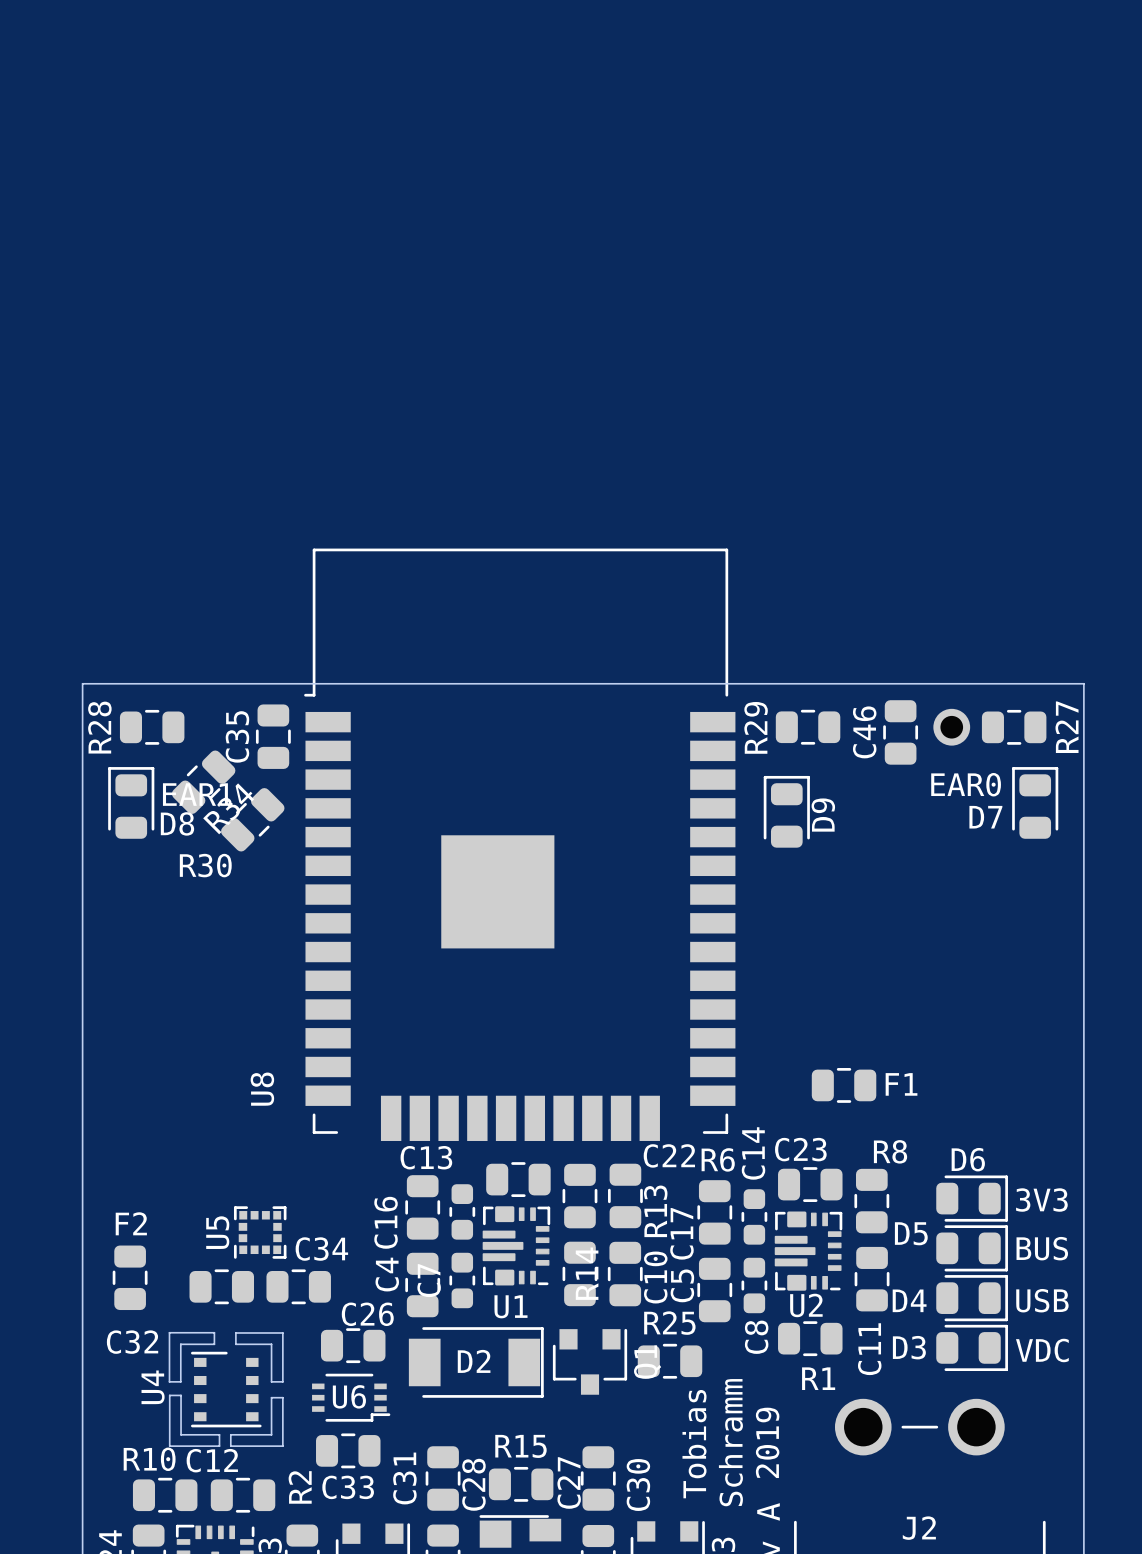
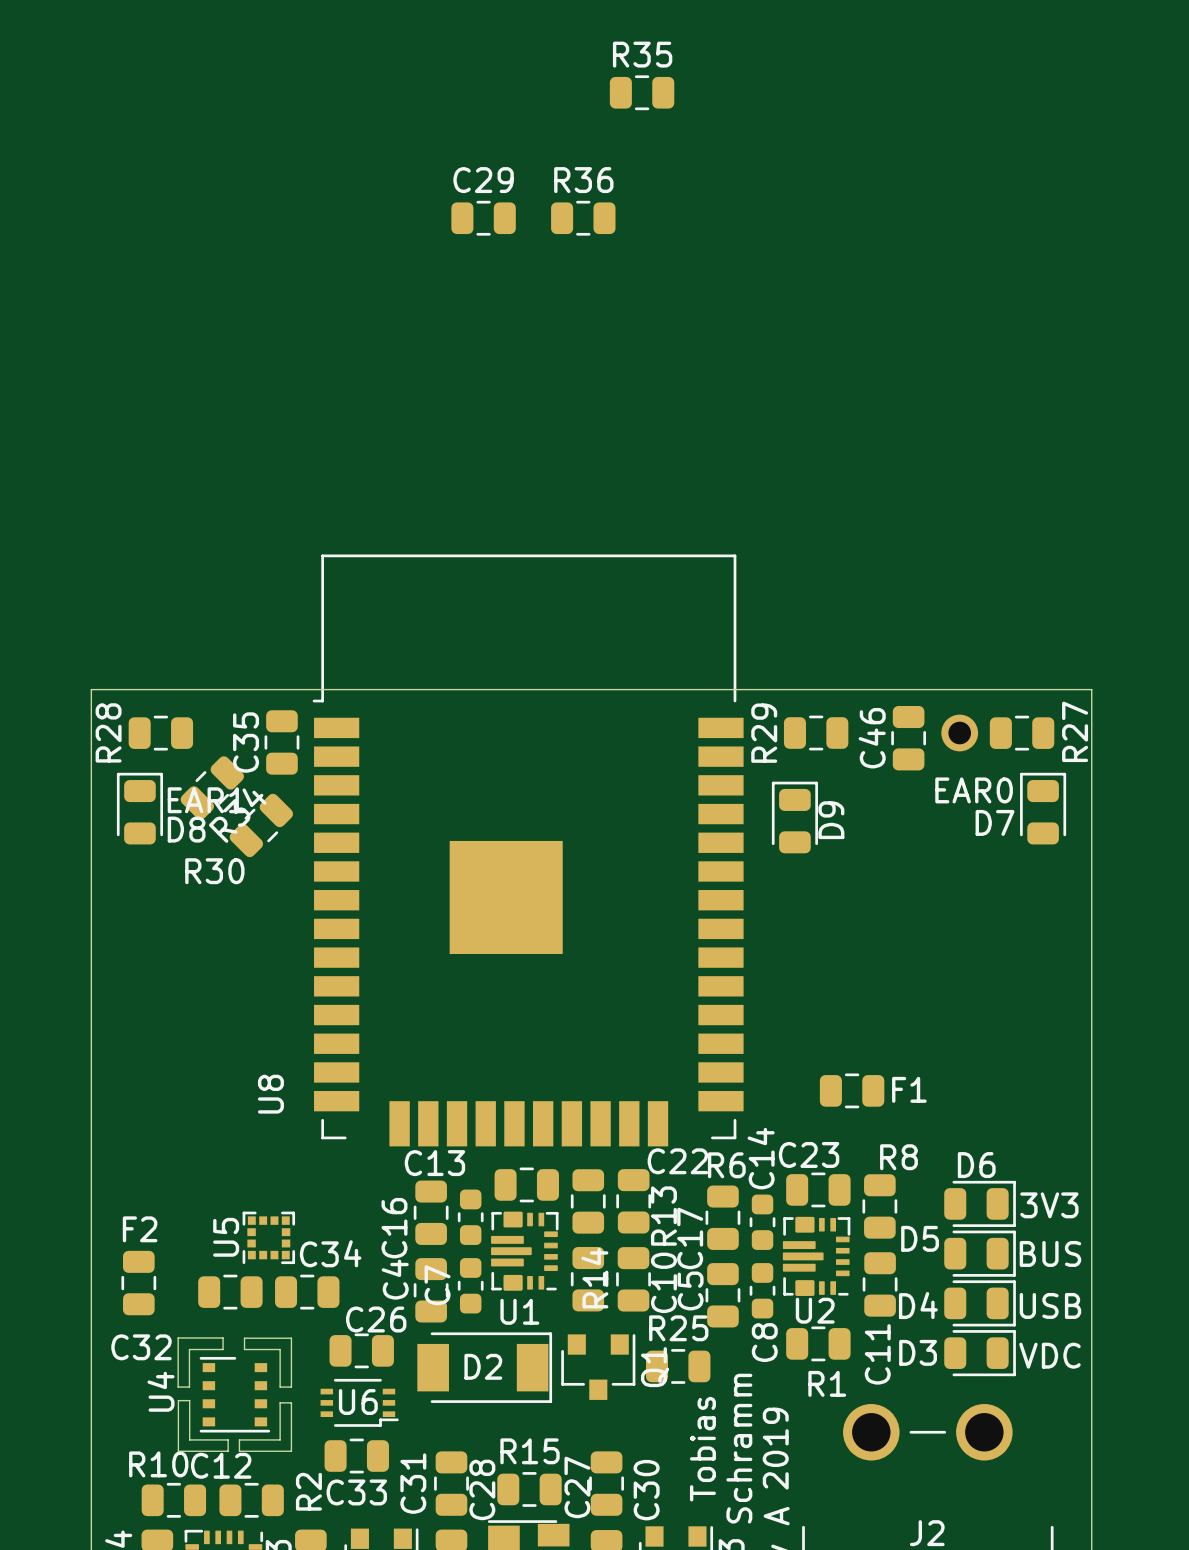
R35: none -> (642, 92)
C29: none -> (483, 218)
R36: none -> (583, 218)

